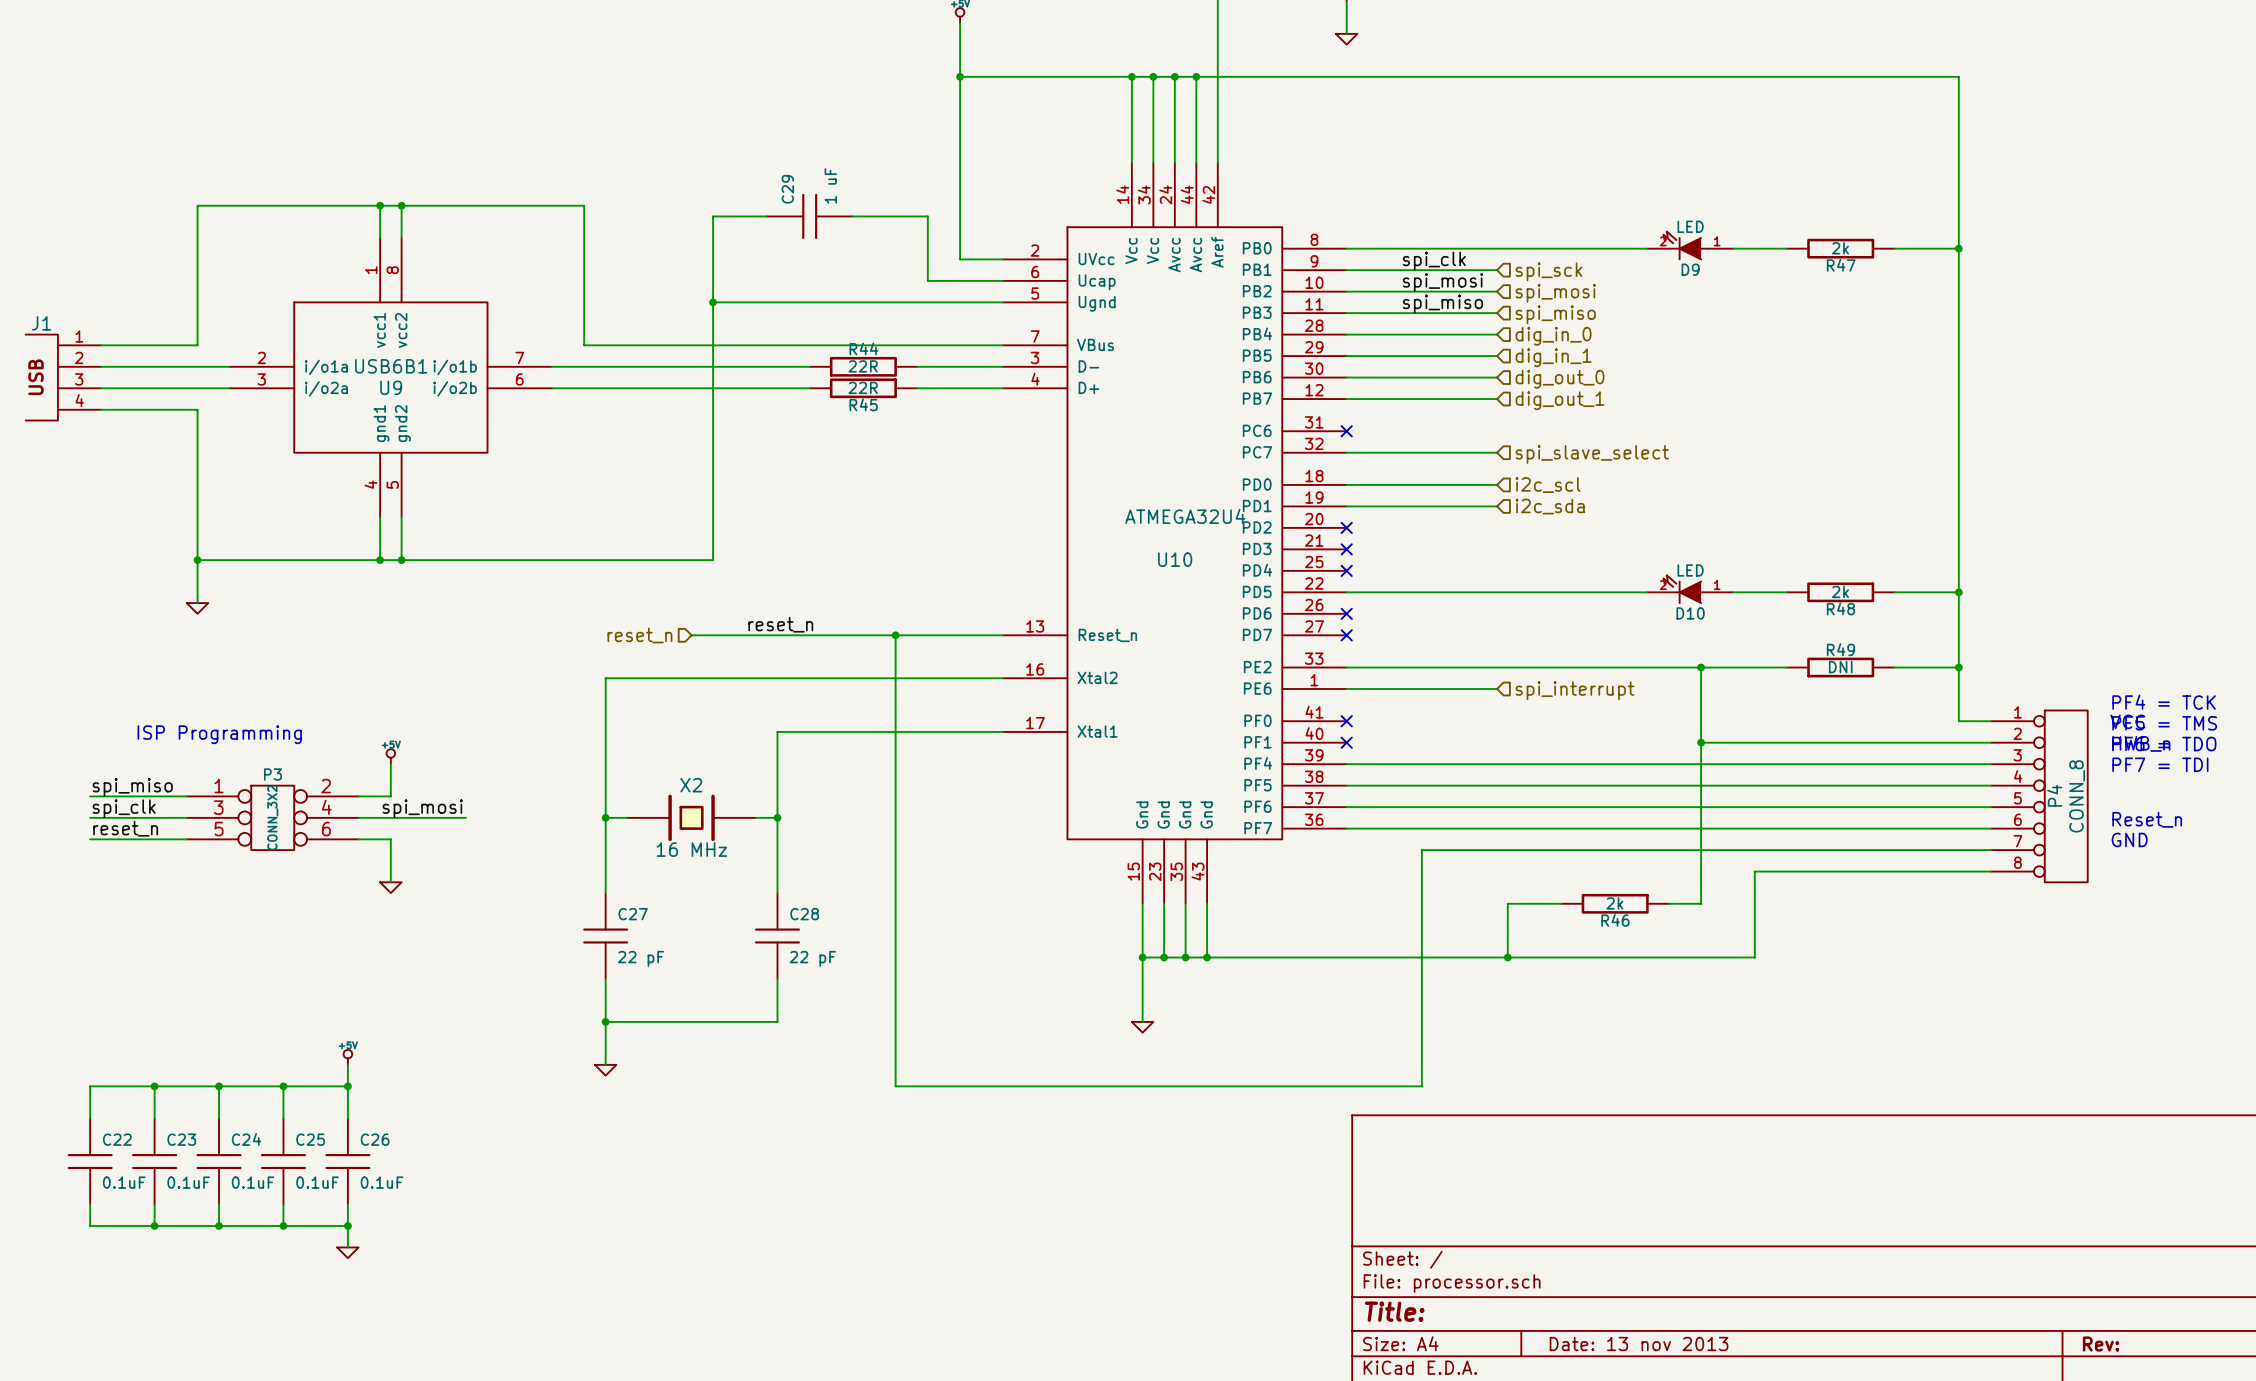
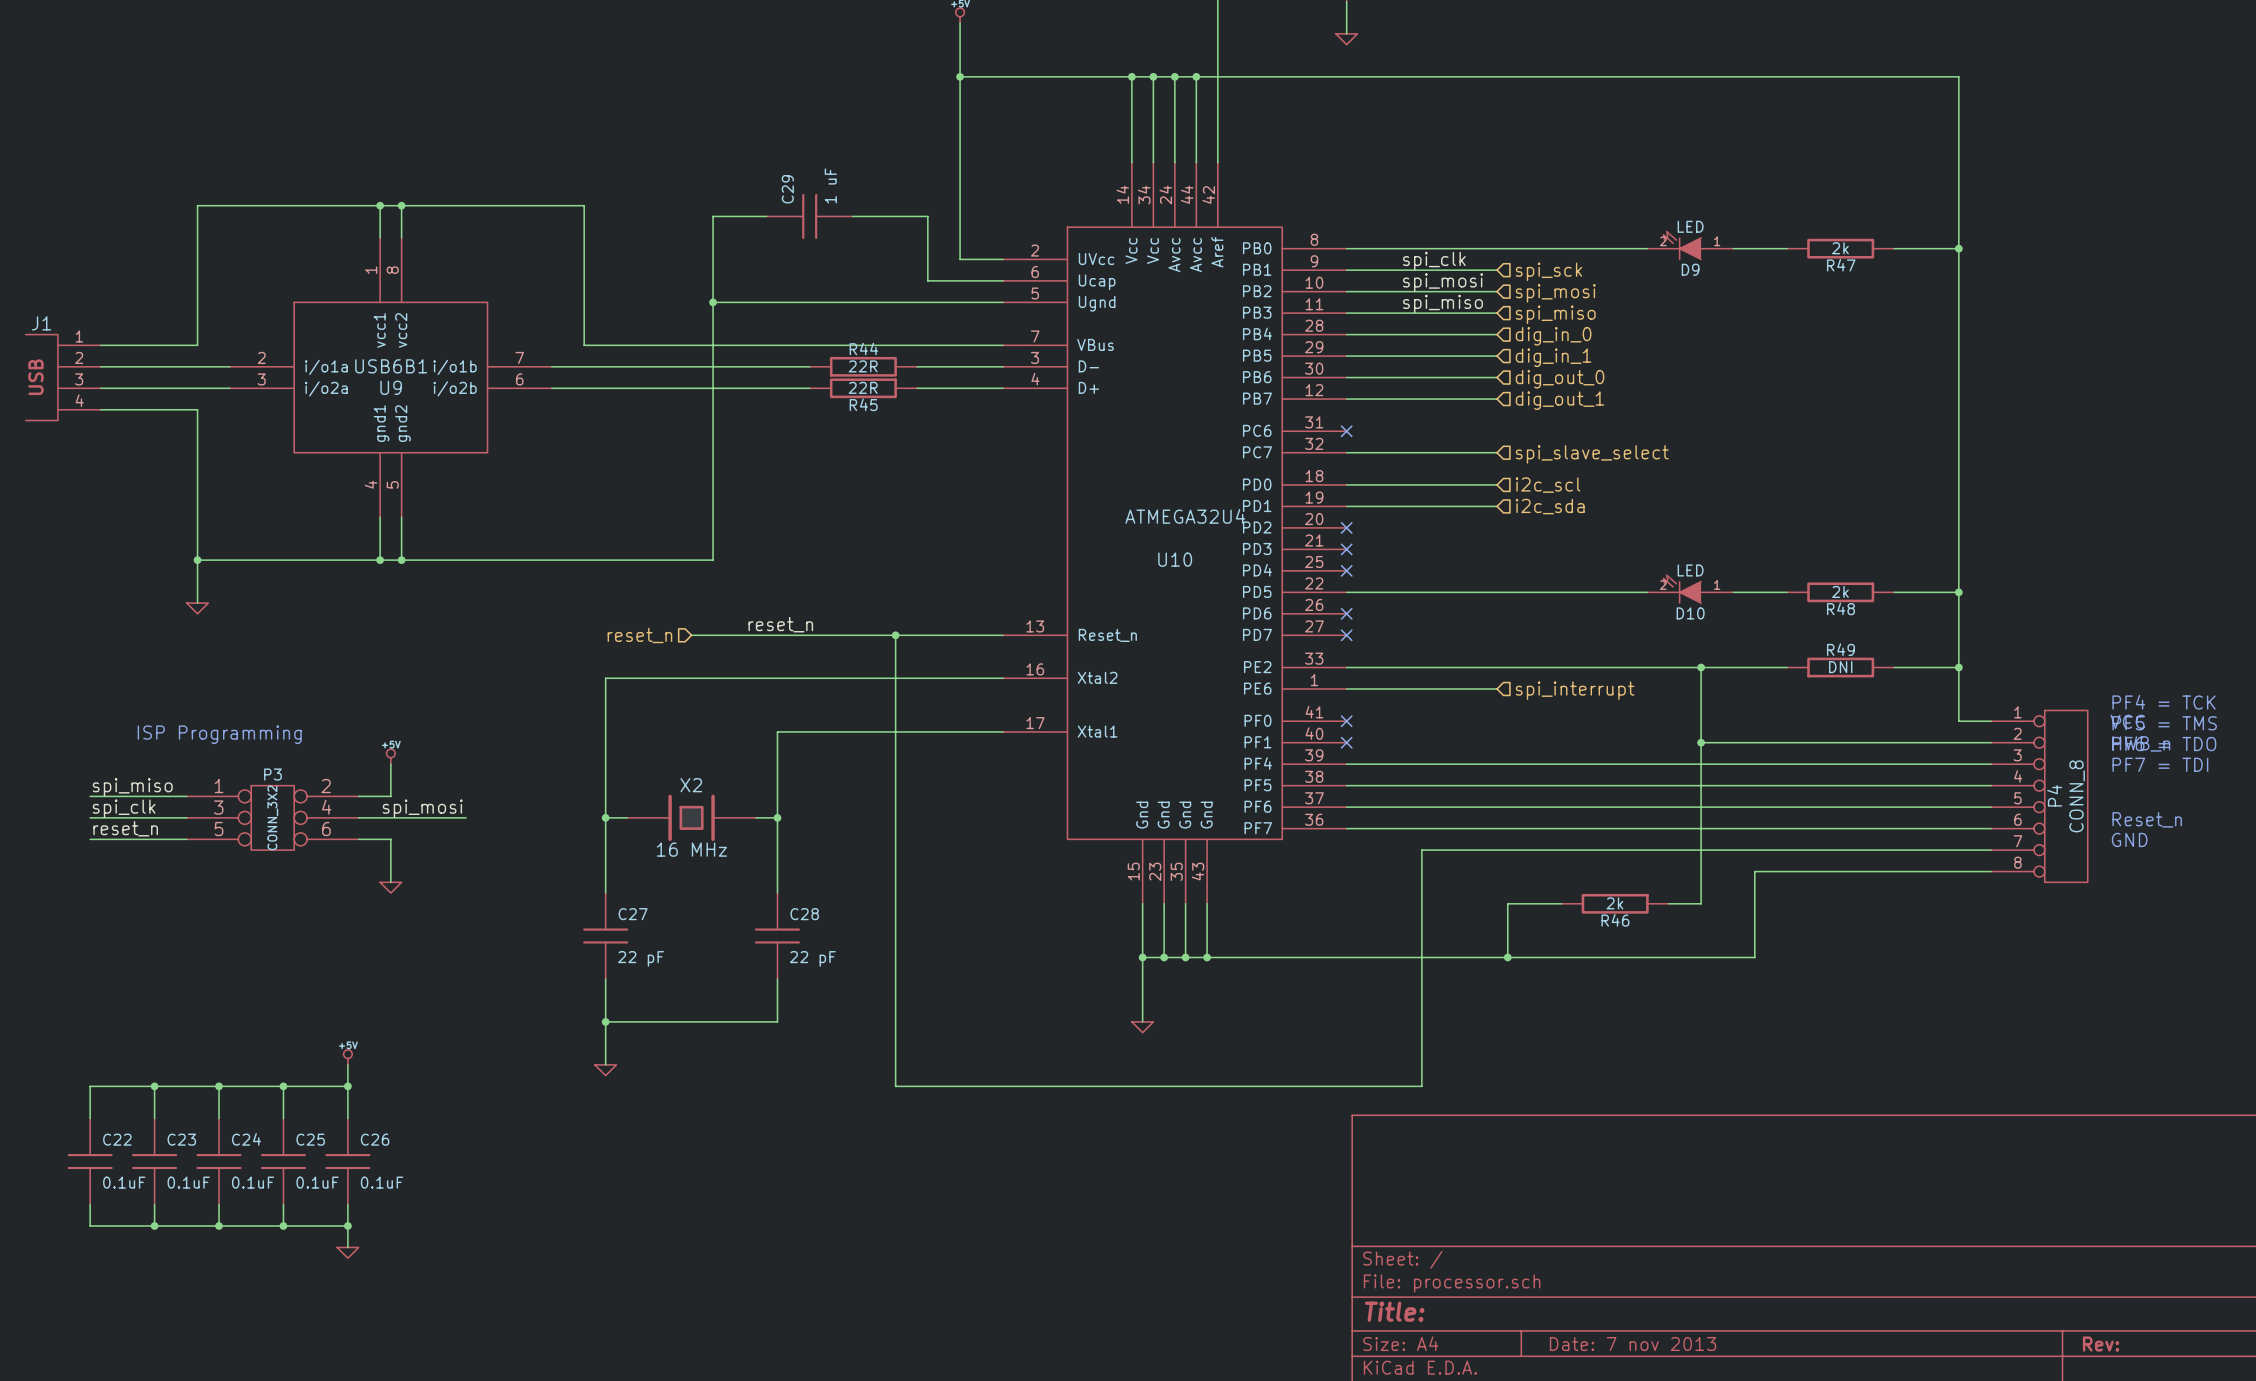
title block: Date: 13 nov 2013 (1639, 1344) -> Date: 7 nov 2013 (1633, 1344)

